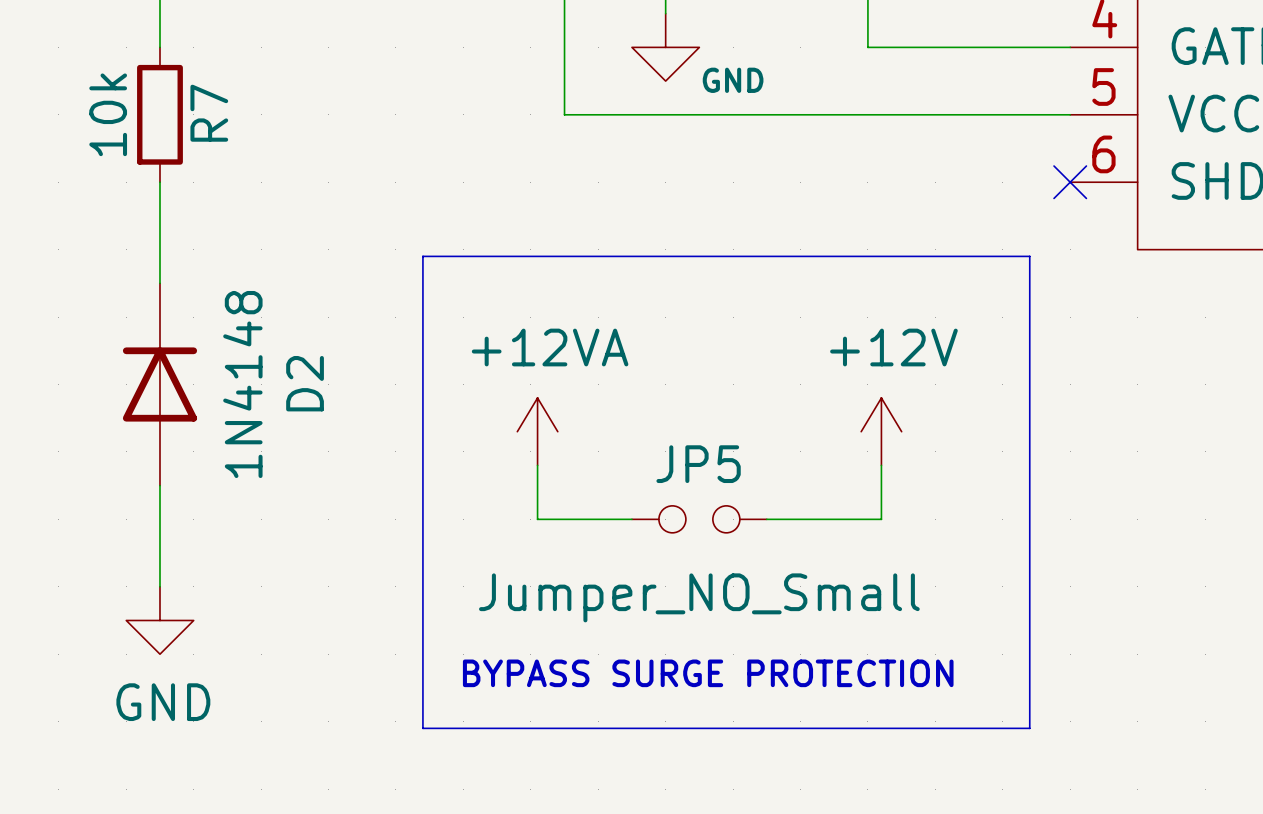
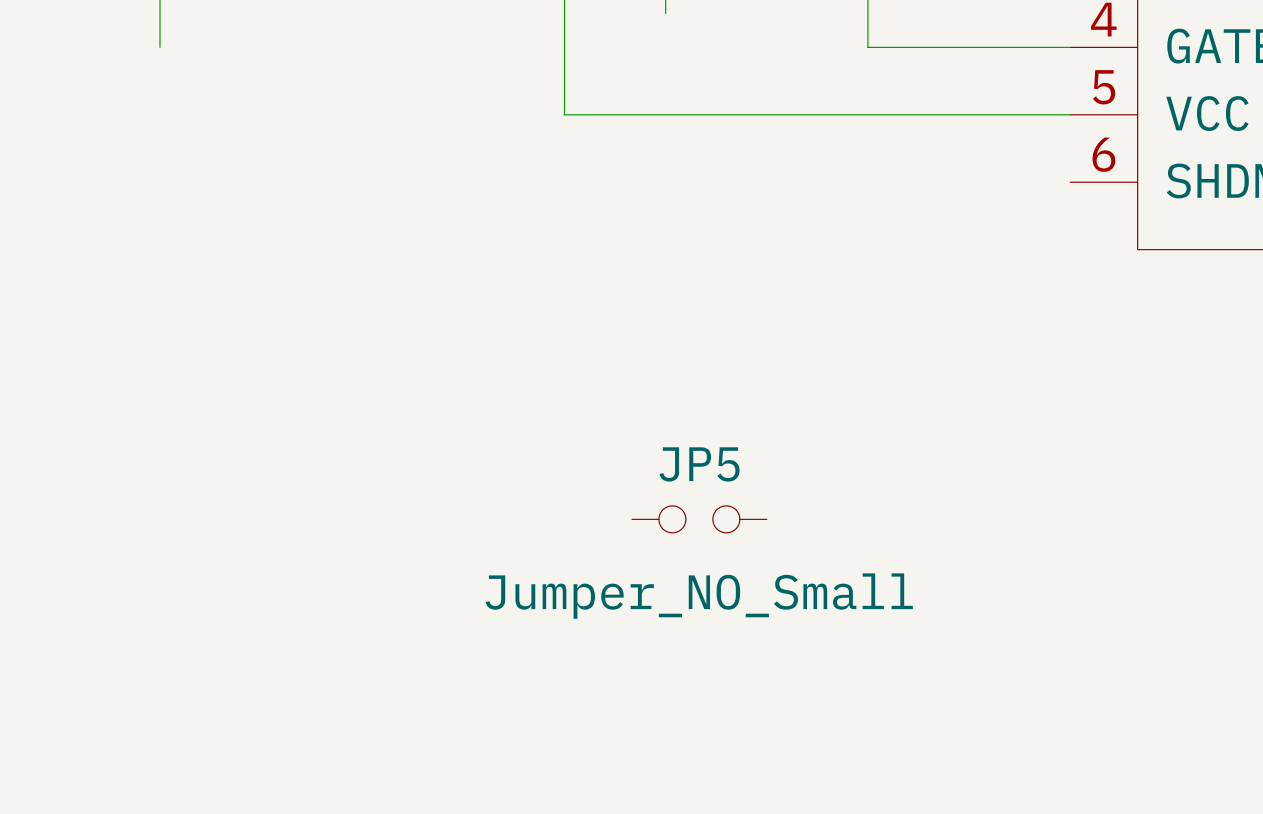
power symbol: GND (665, 47) -> none
R7: 10k (159, 114) -> none
wire: (159, 182) (159, 283) -> none
no-connect mark: (1070, 182) -> none
line: (422, 256) (422, 728) (1029, 728) (1029, 256) (422, 256) -> none
D2: 1N4148 (159, 384) -> none
power symbol: +12VA (537, 431) -> none
power symbol: +12V (881, 431) -> none
wire: (537, 465) (537, 519) (631, 519) -> none
wire: (881, 465) (881, 519) (766, 519) -> none
wire: (159, 485) (159, 586) -> none
power symbol: GND (159, 620) -> none
text: BYPASS SURGE PROTECTION (708, 673) -> none

